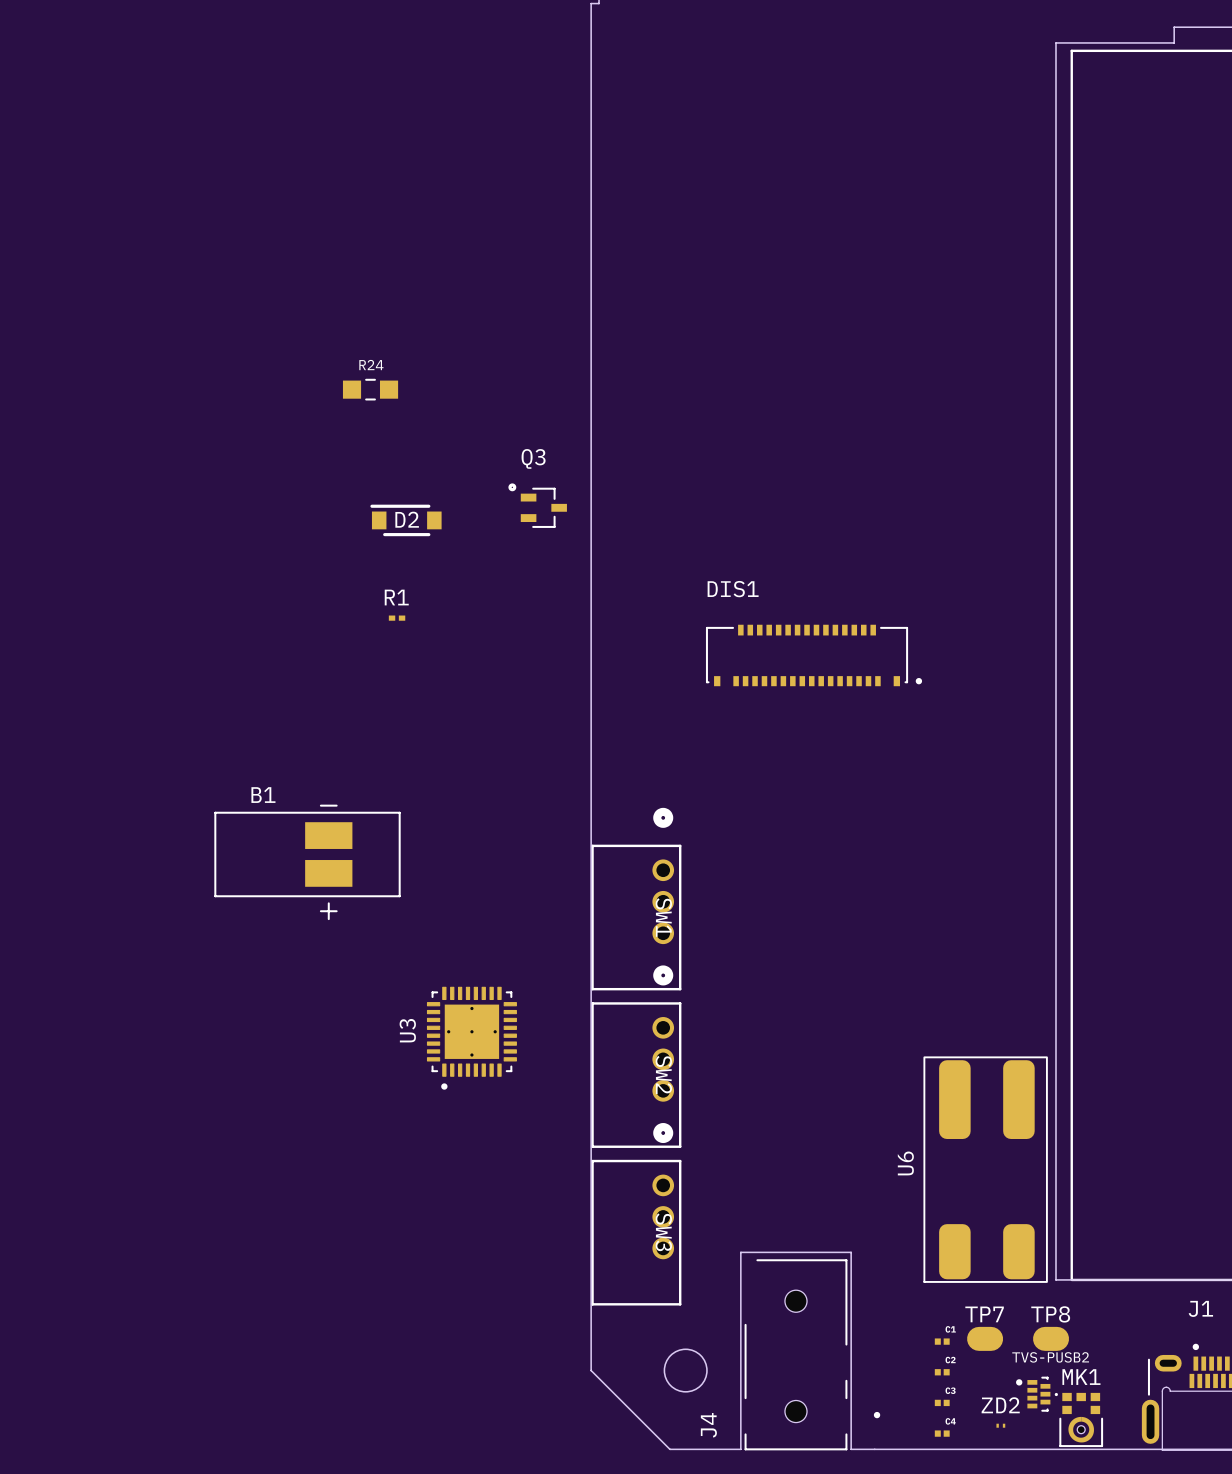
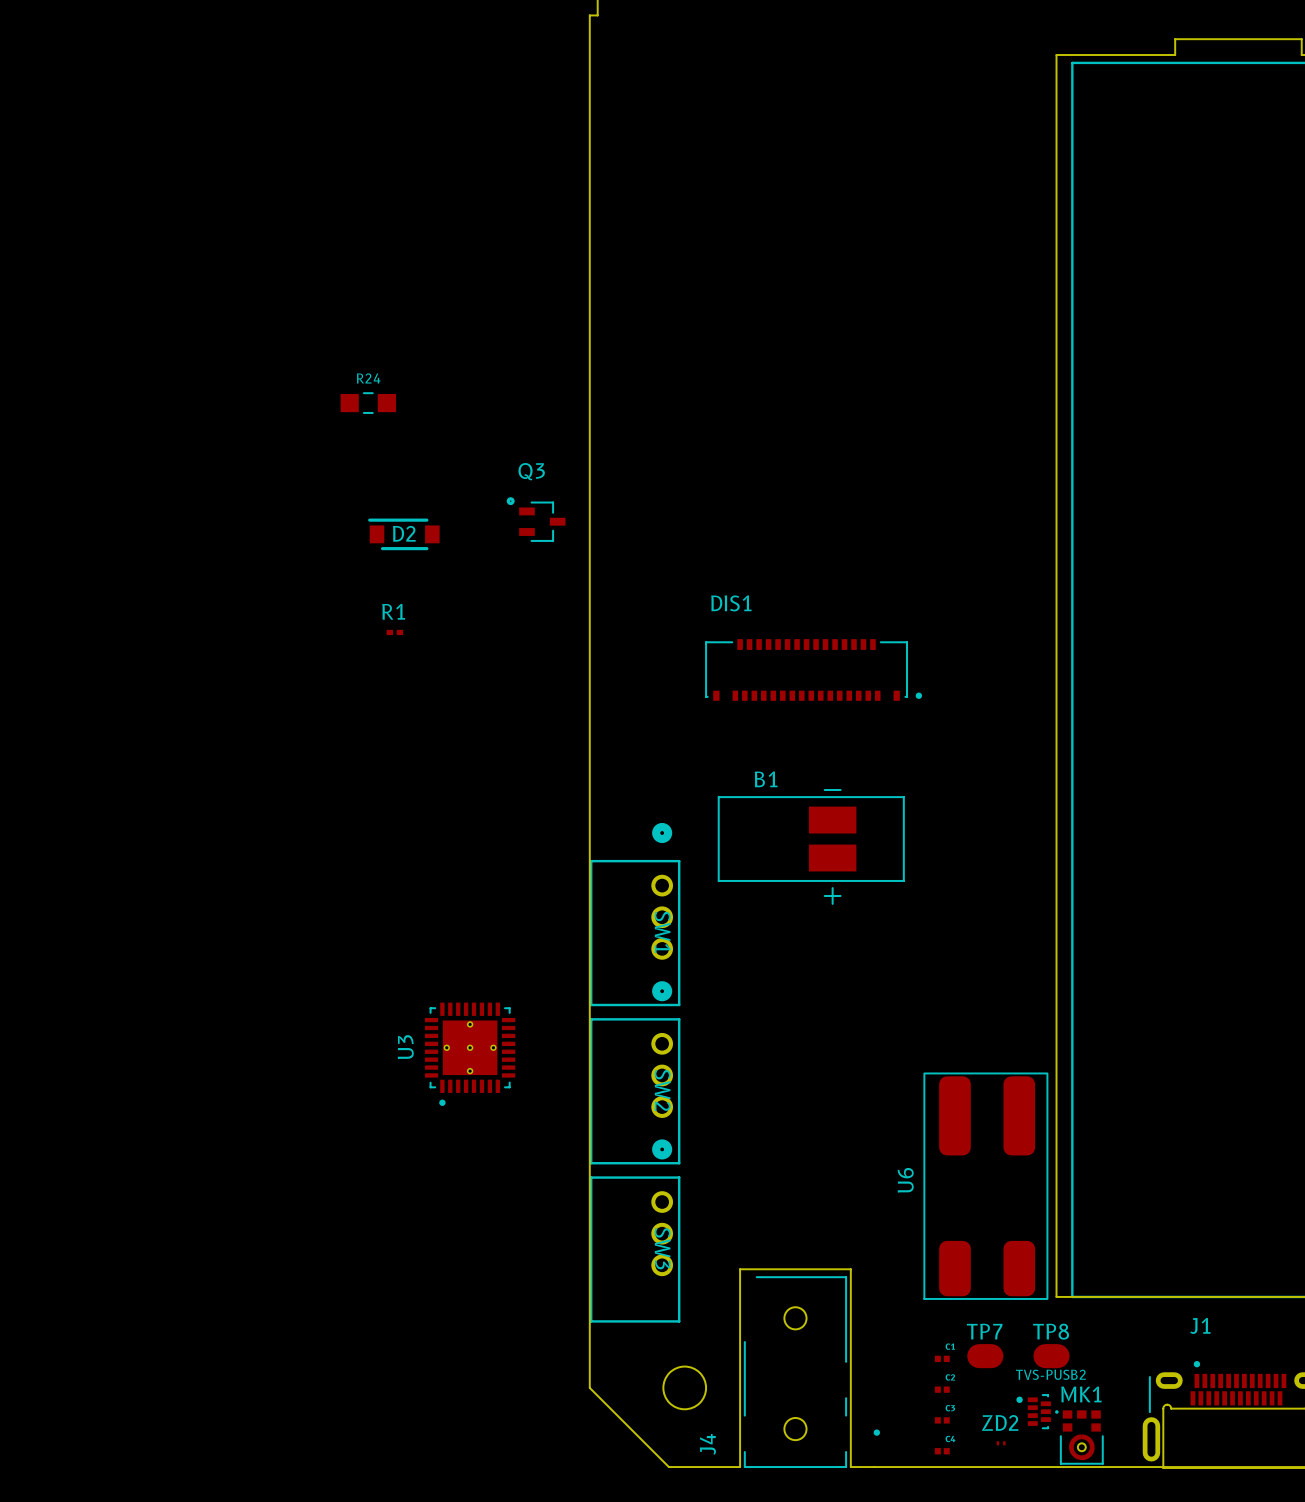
B1 position: (307, 862) -> (811, 846)

